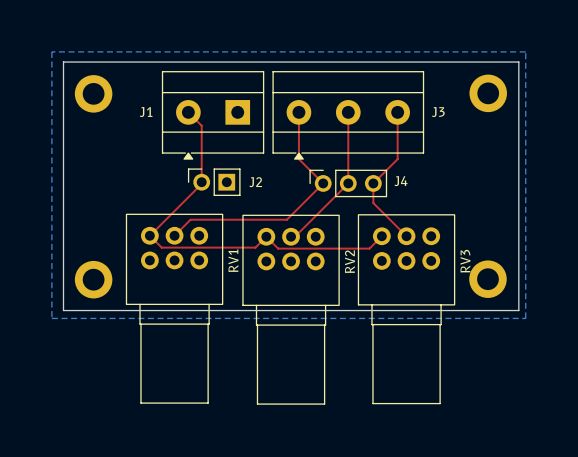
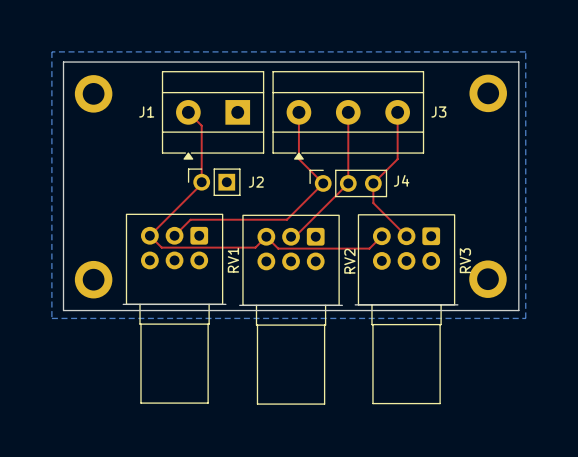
RV1 footprint: [125, 213, 224, 404] -> [122, 213, 227, 404]
RV2 footprint: [242, 214, 340, 405] -> [239, 214, 343, 405]
RV3 footprint: [357, 214, 456, 405] -> [354, 214, 459, 405]

